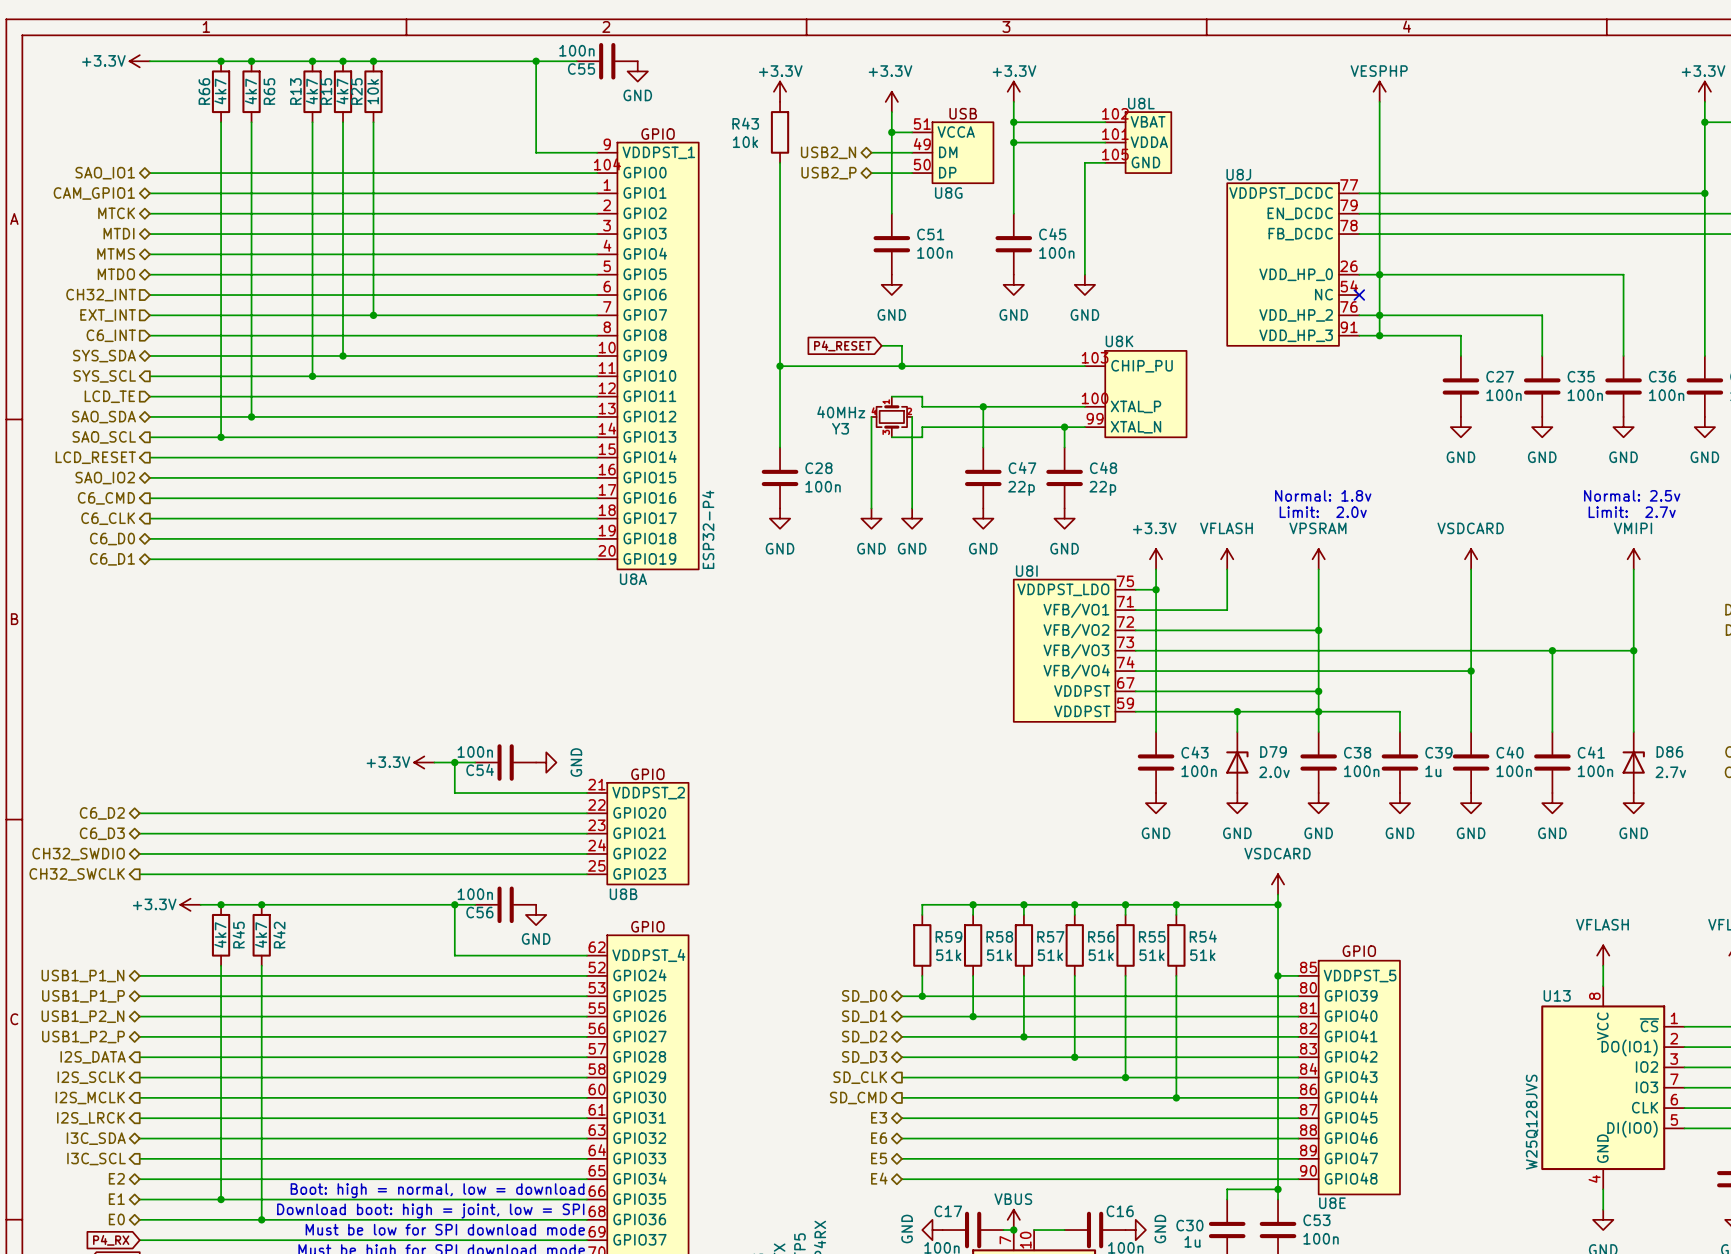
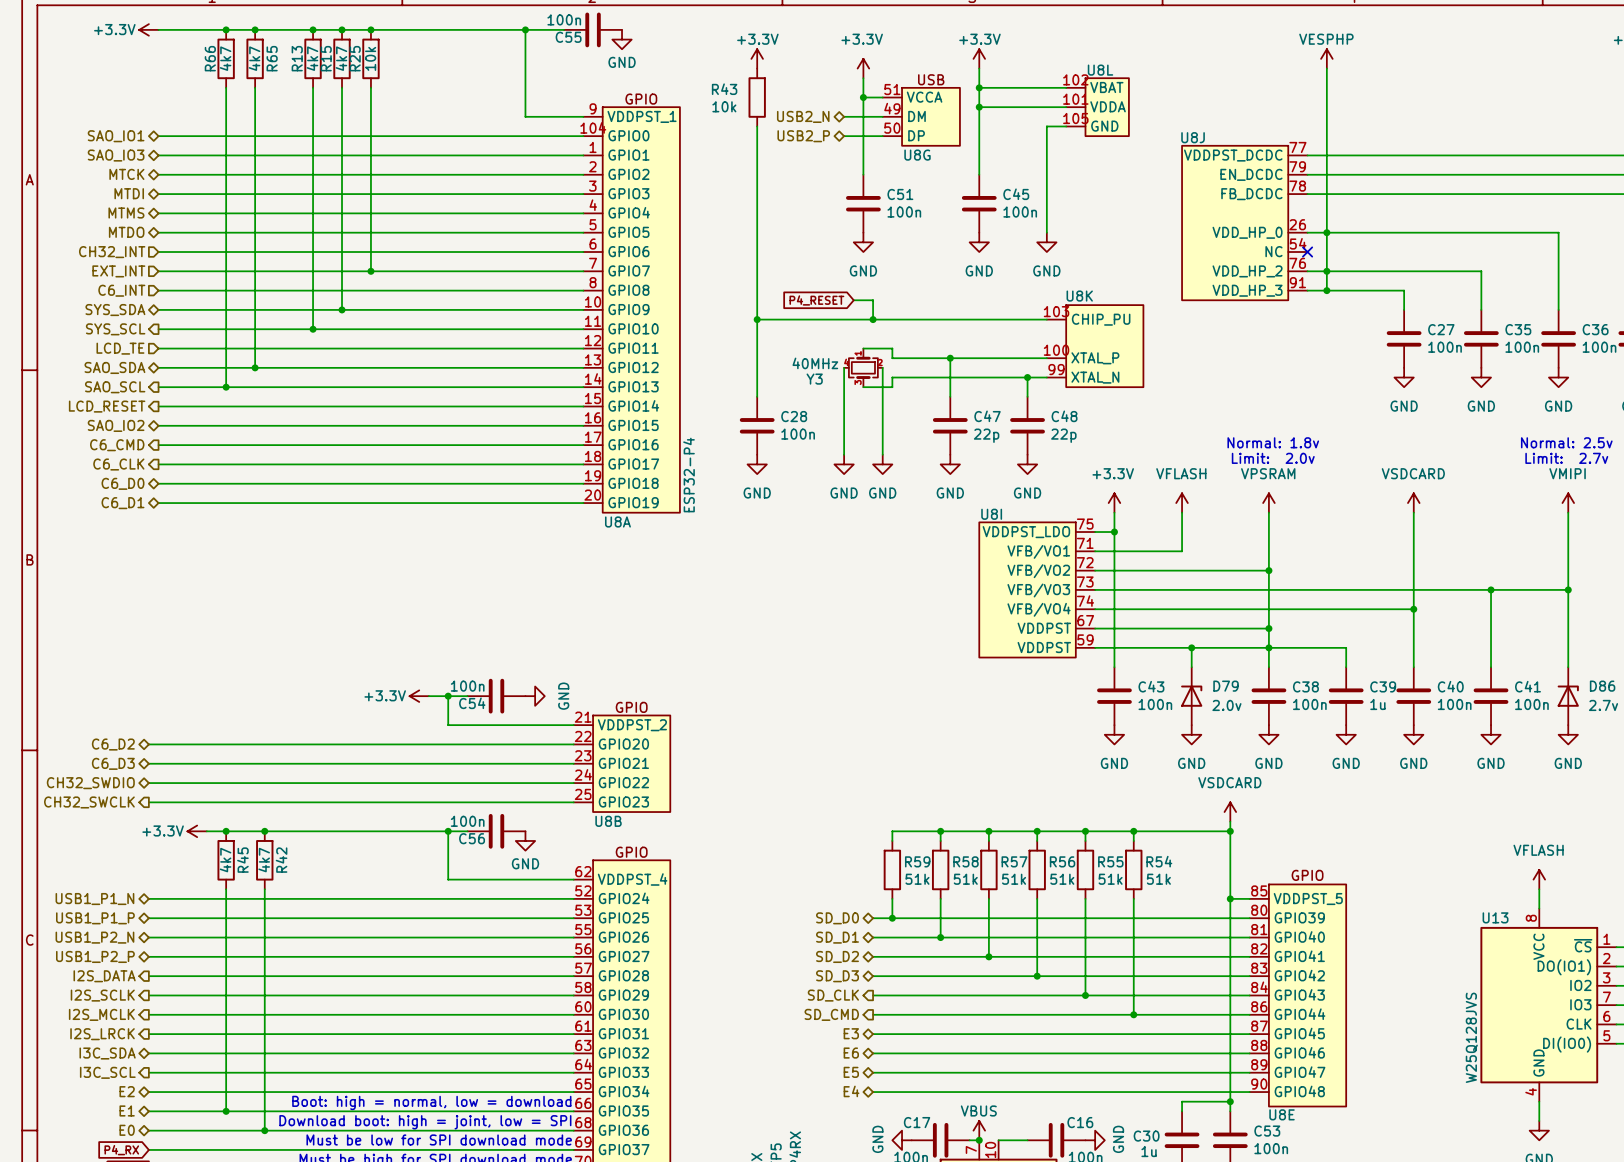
hierarchical label: CAM_GPIO1 (94, 193) -> SAO_IO3 (116, 155)

